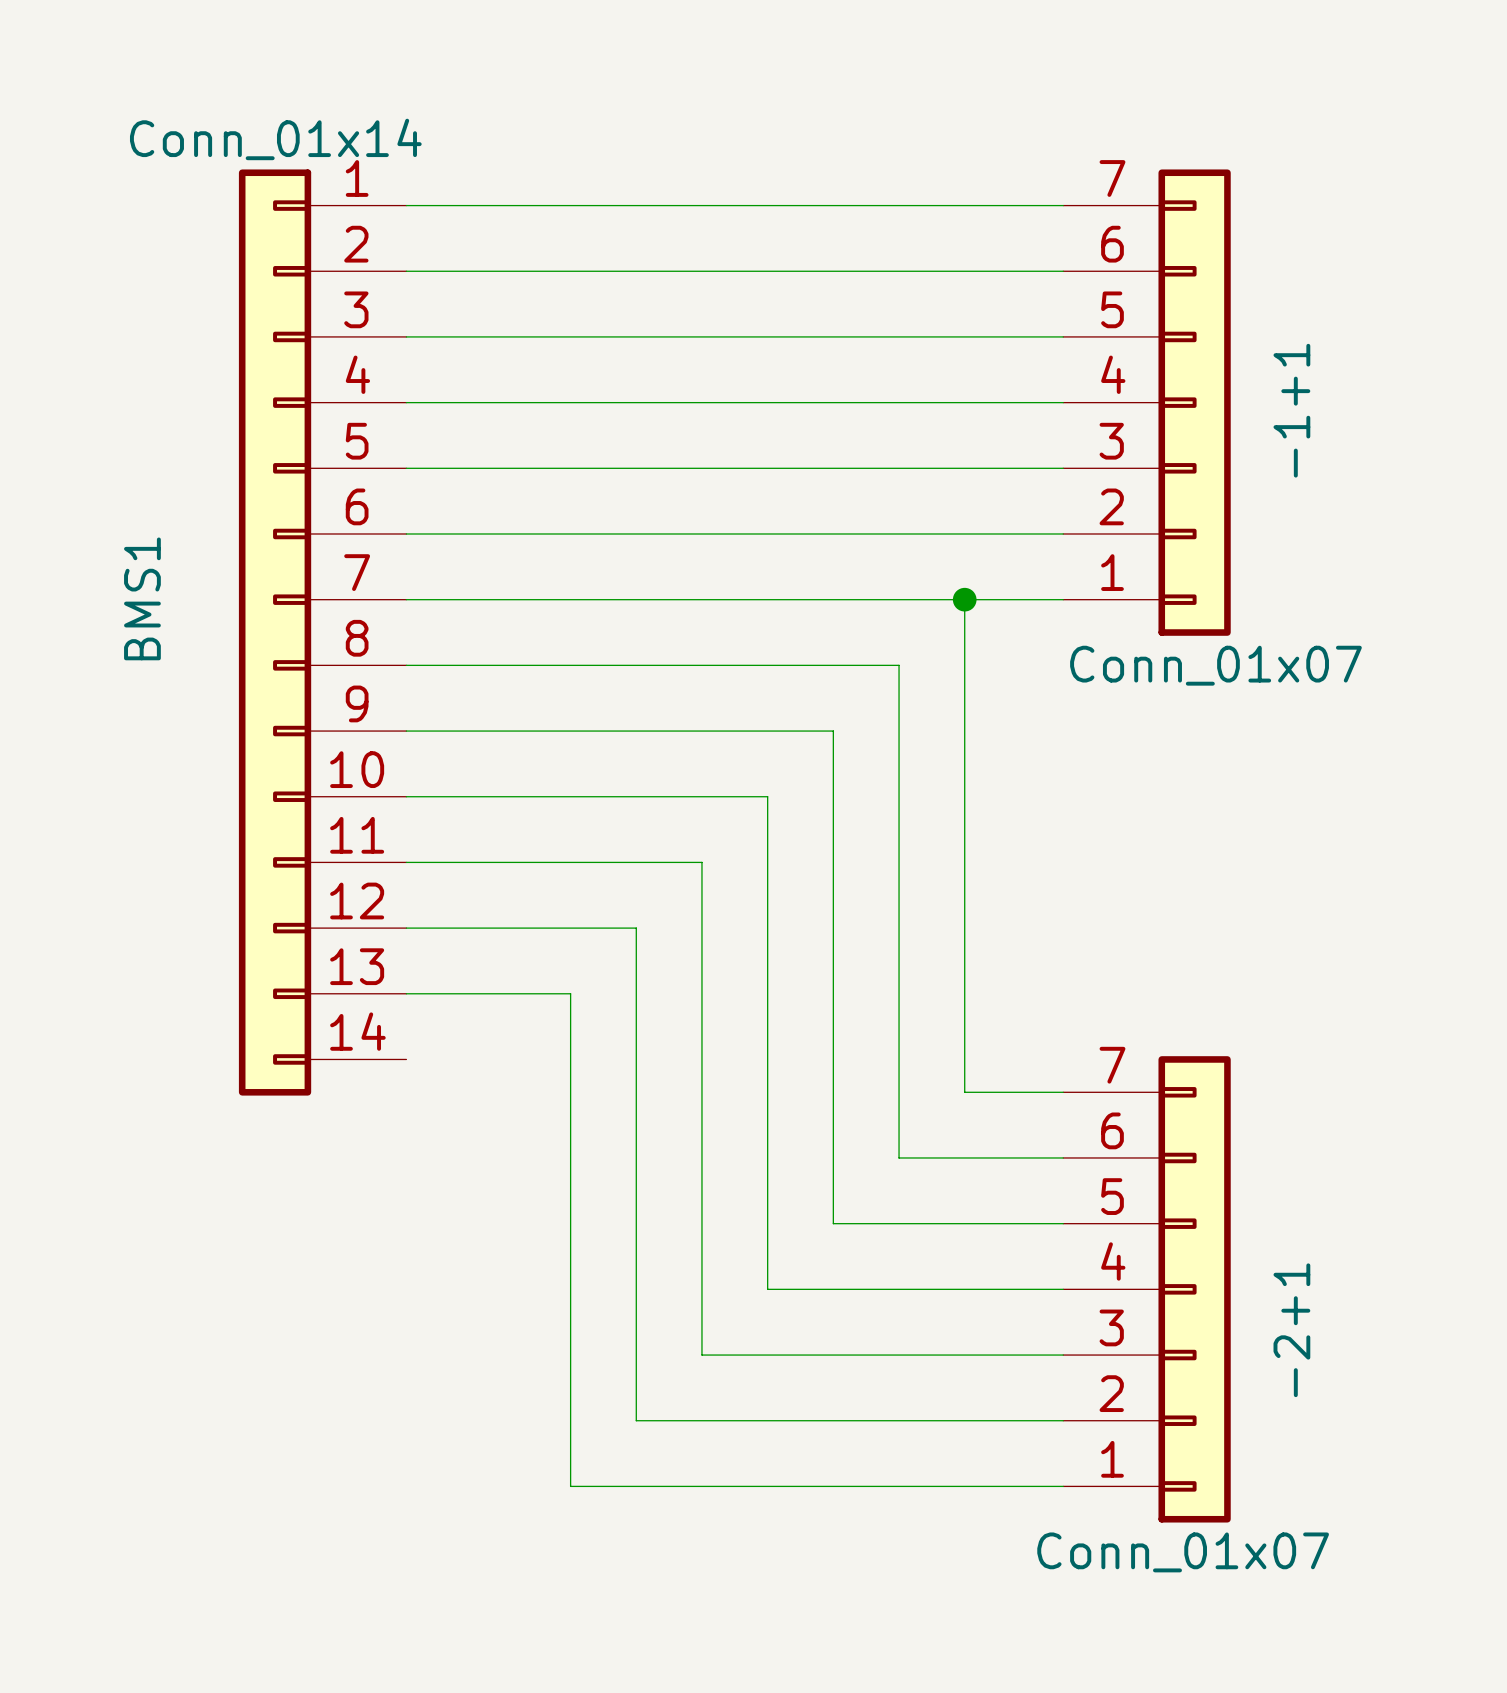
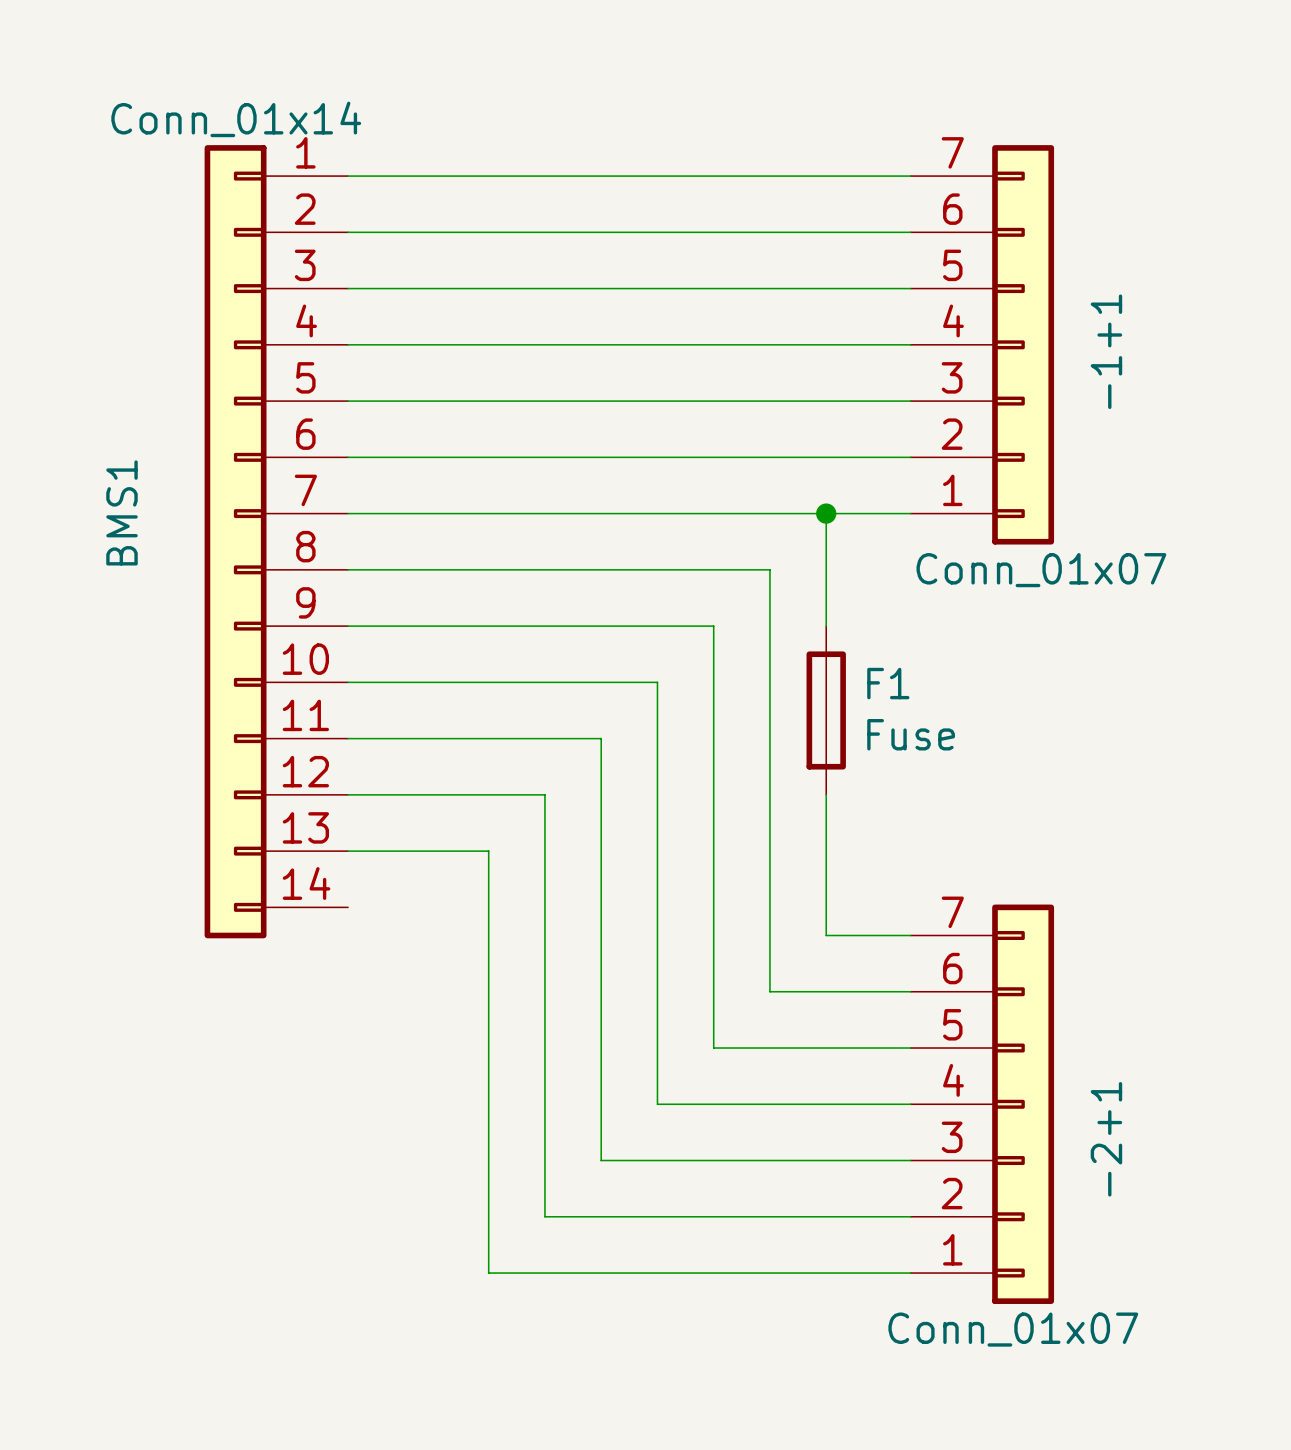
F1: none -> Fuse (826, 710)

